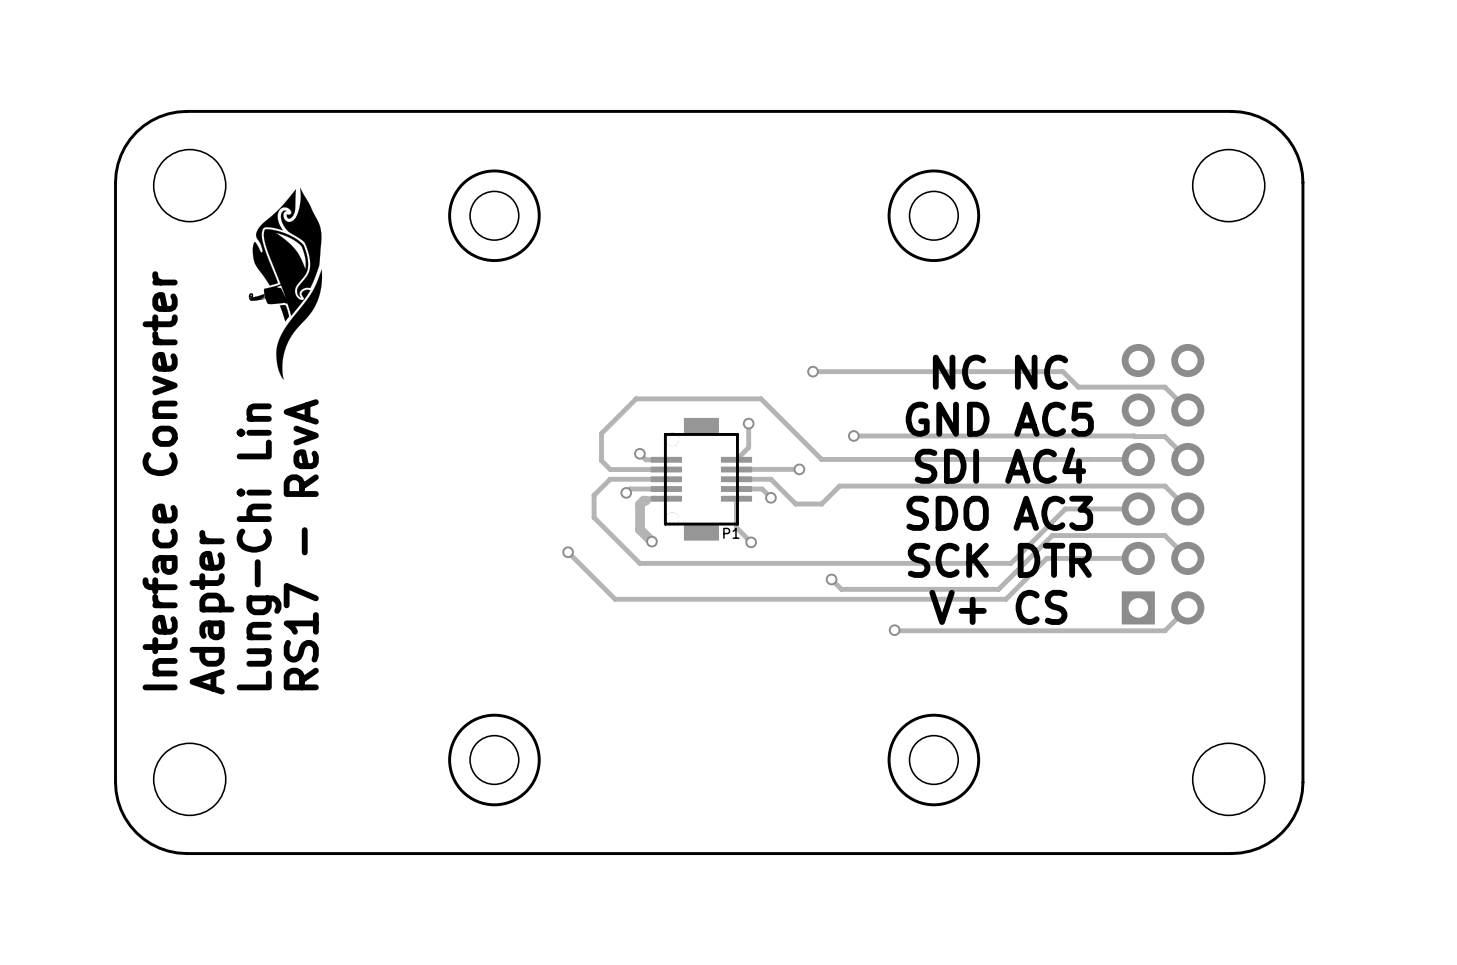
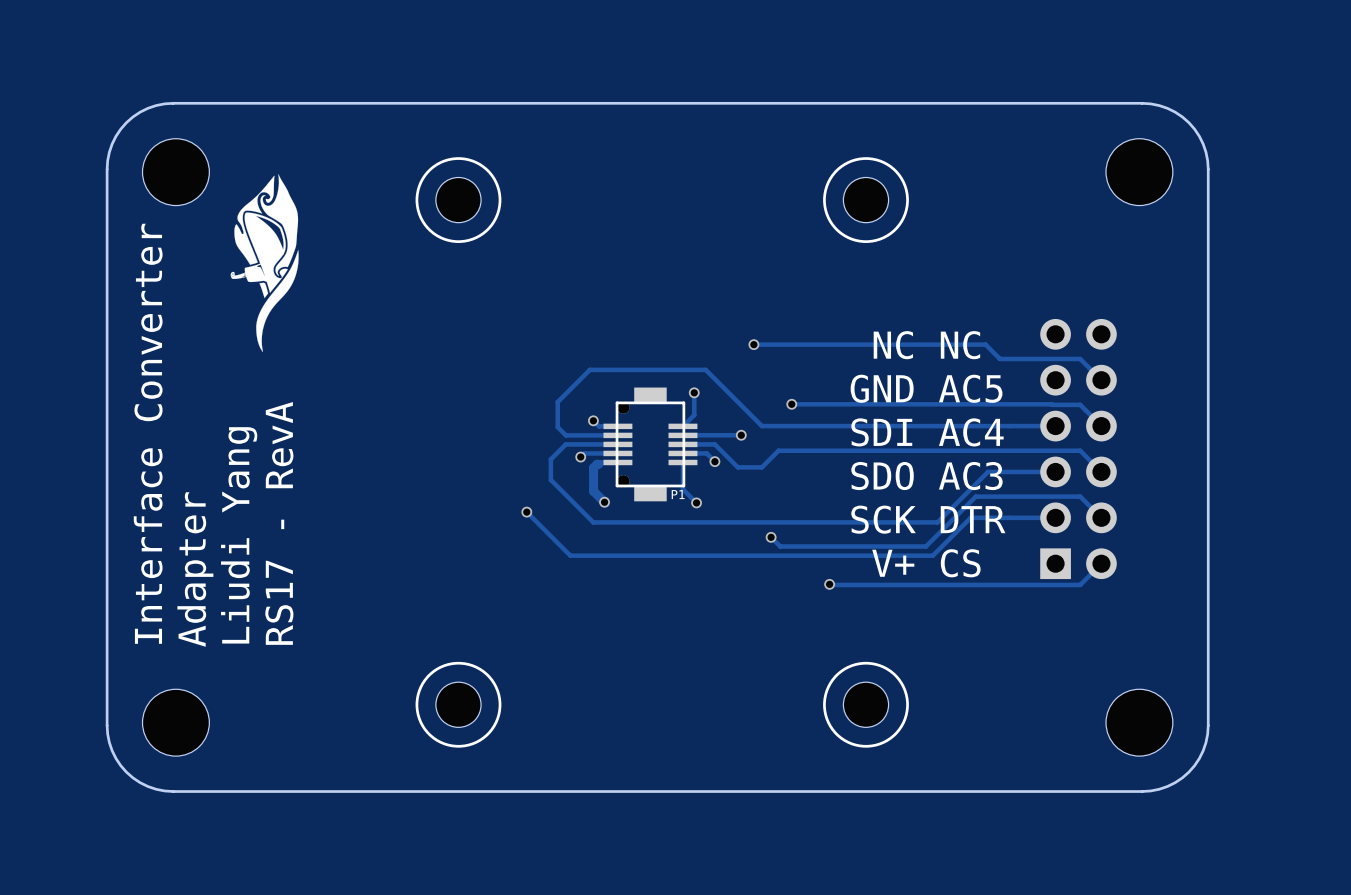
text: Lung-Chi Lin (259, 546) -> Liudi Yang (239, 535)

